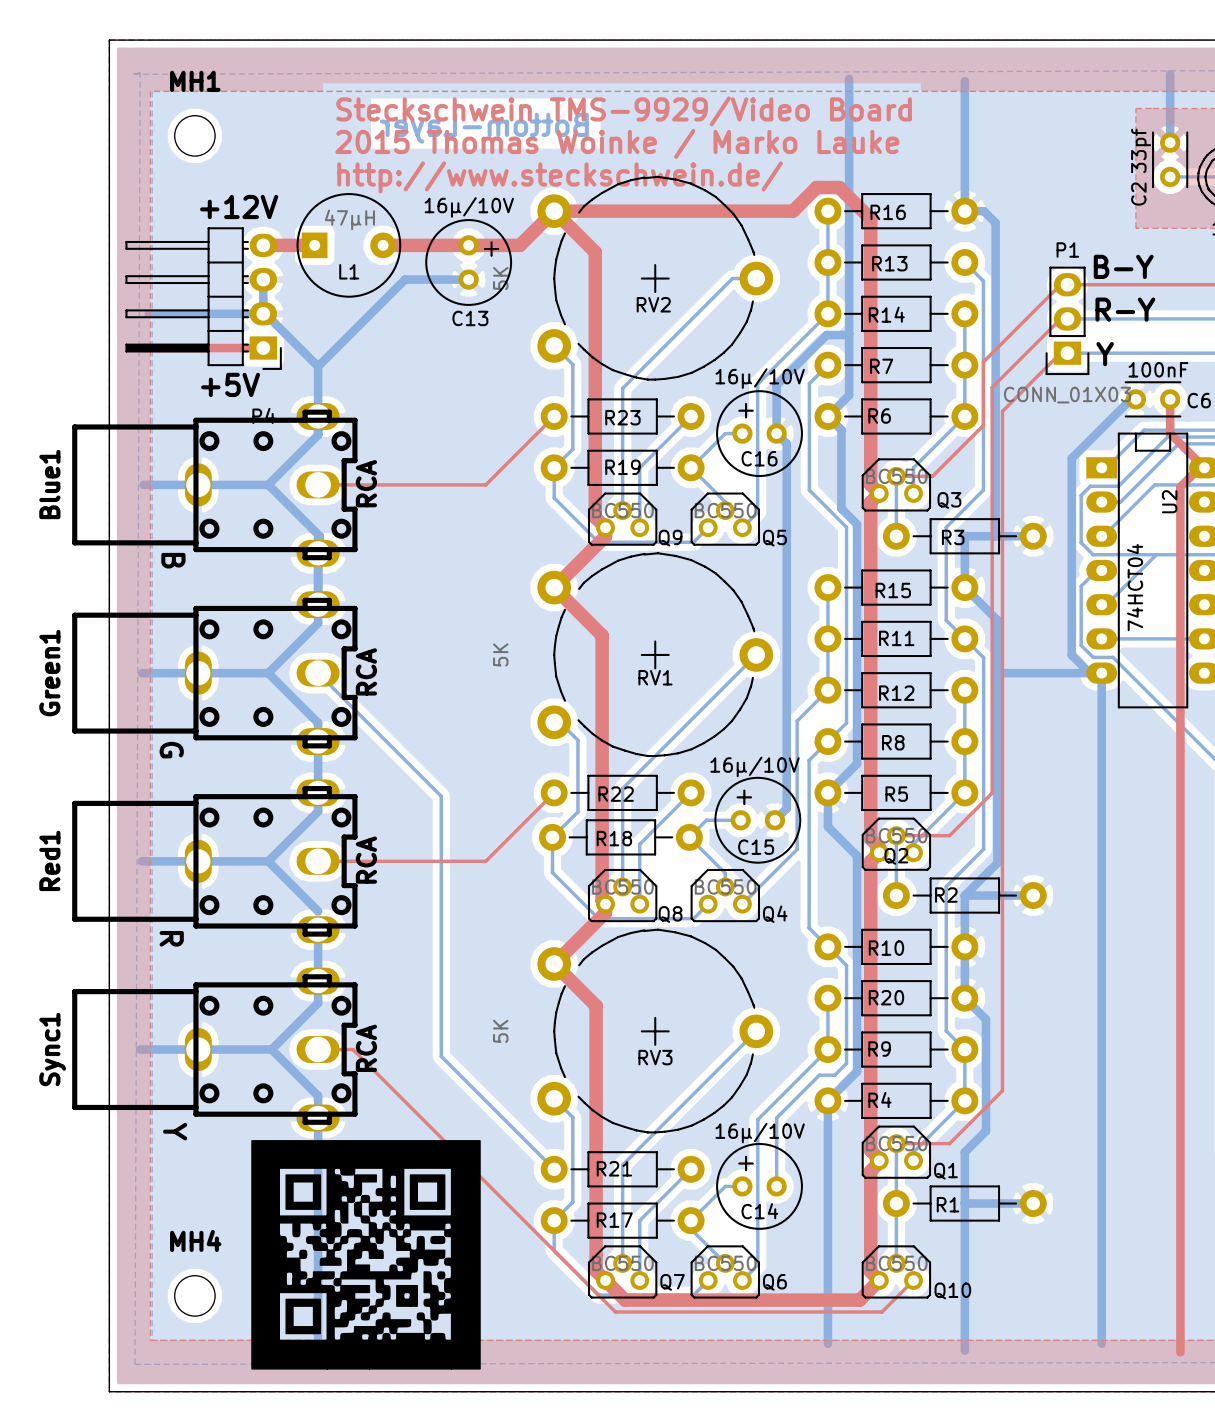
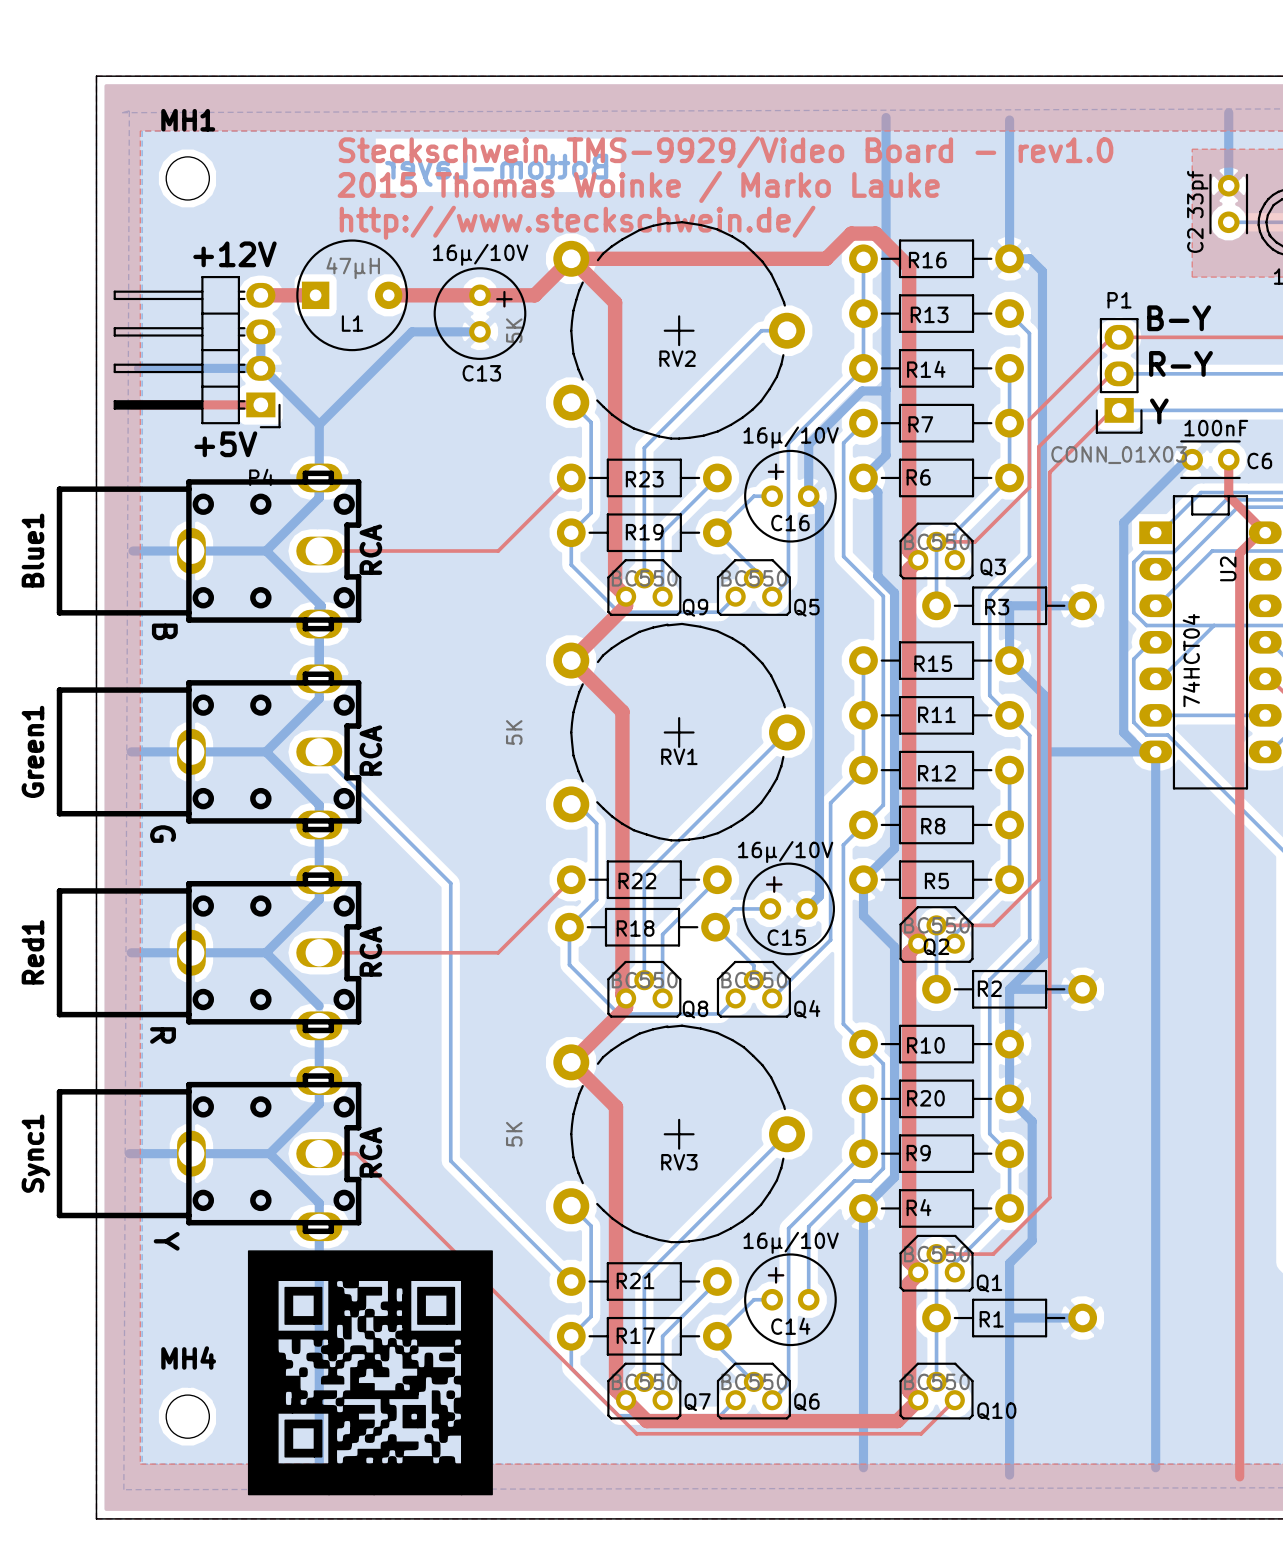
text: Steckschwein TMS-9929/Video Board (624, 111) -> Steckschwein TMS-9929/Video Board - rev1.0 (726, 152)

